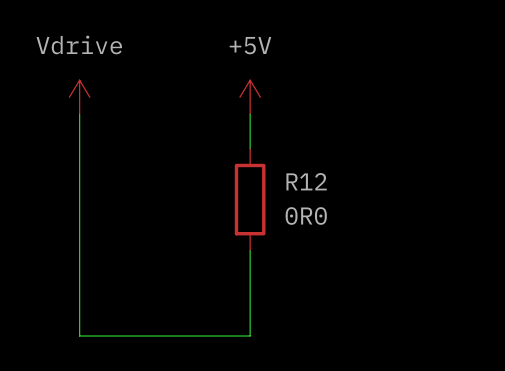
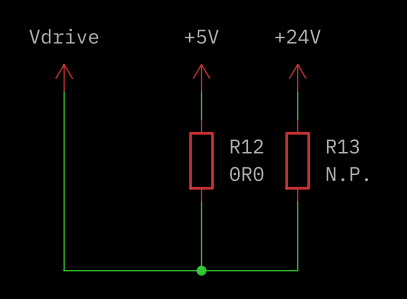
power symbol: none -> +24V (297, 78)
wire: none -> (297, 92) (297, 119)
R13: none -> N.P. (297, 160)
wire: none -> (297, 201) (297, 270) (201, 270)
junction: none -> (201, 270)

